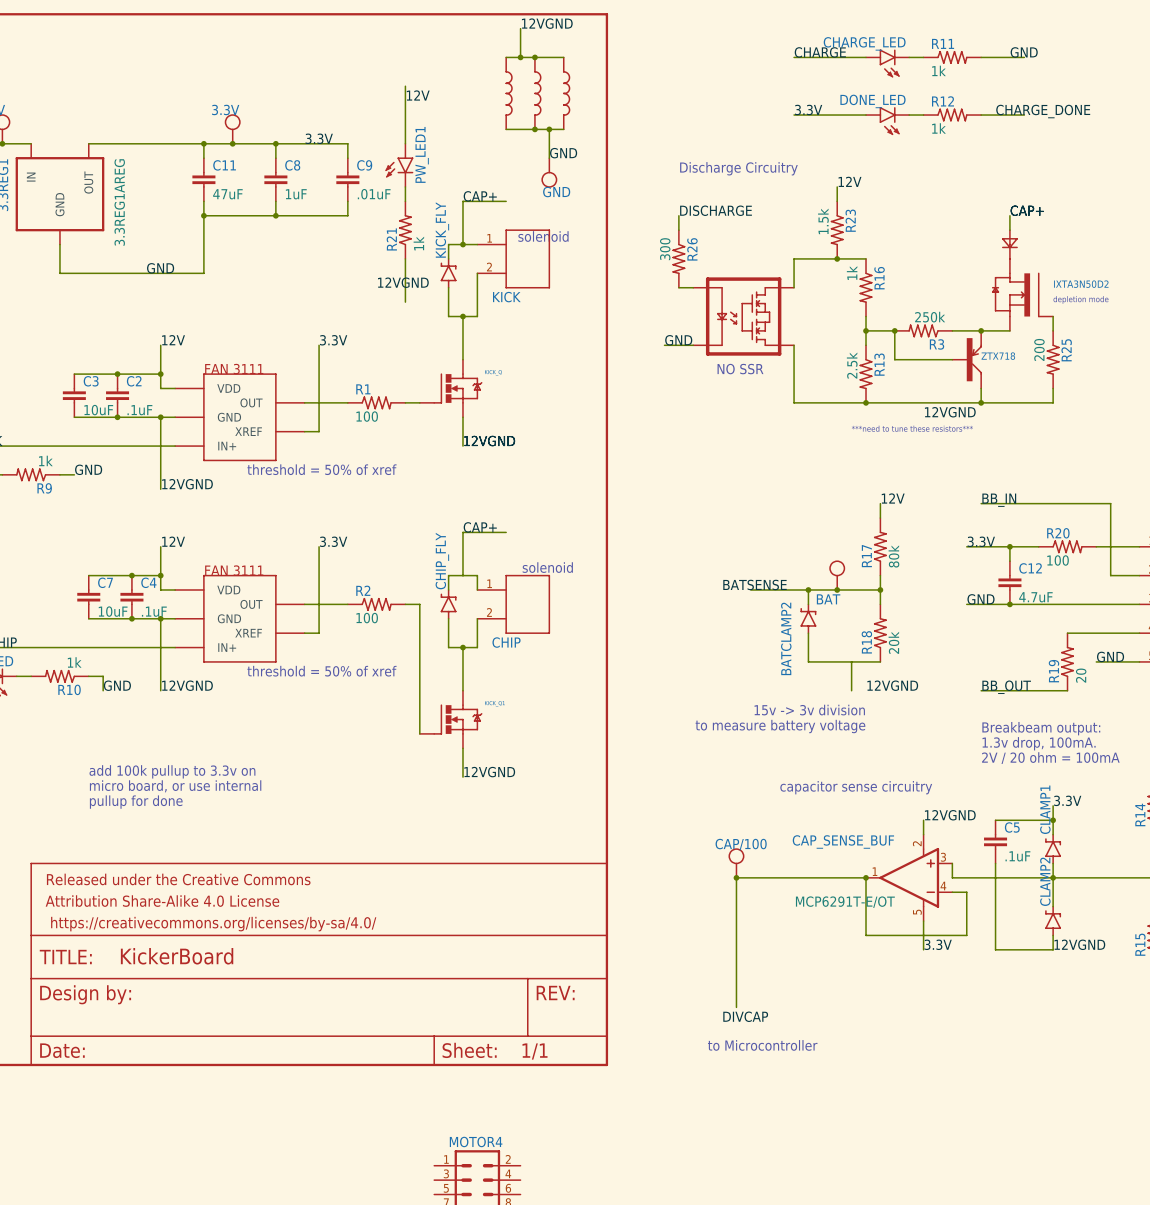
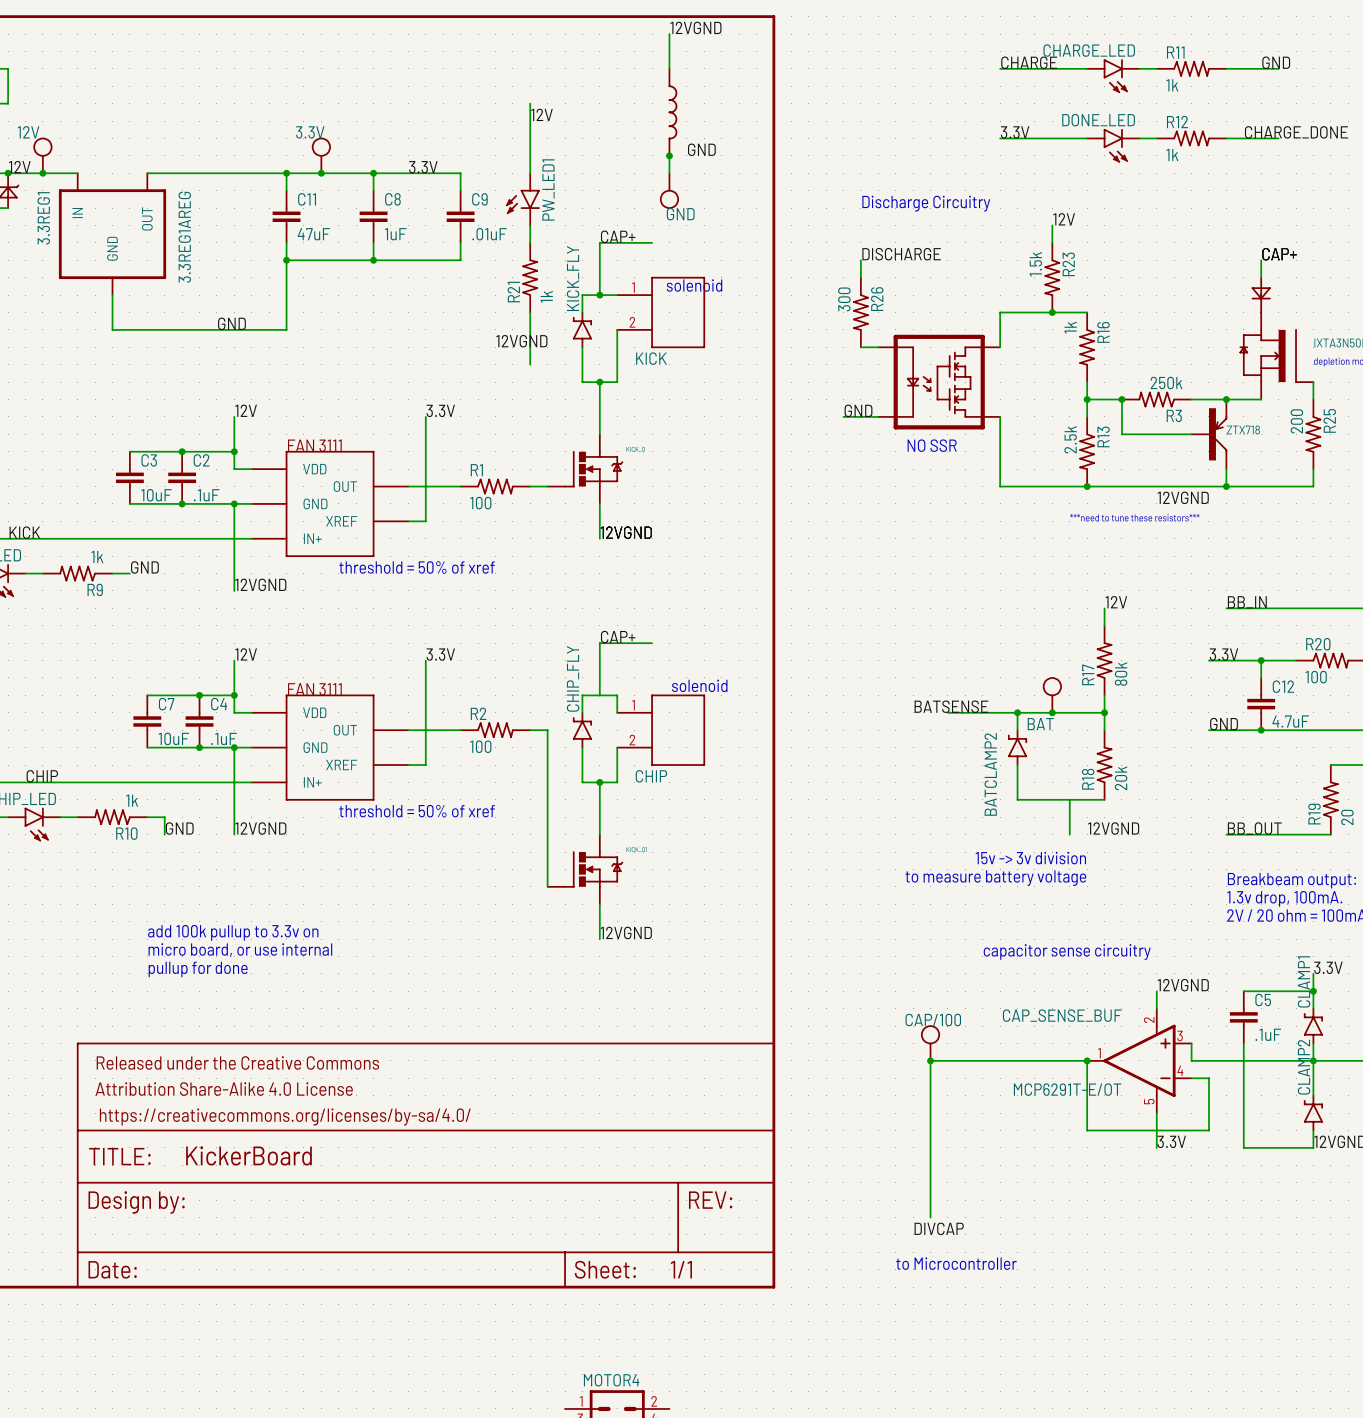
wire: (506, 57) (563, 57) -> none
junction: (520, 57) -> none
junction: (534, 57) -> none
part: (509, 93) -> none
part: none -> (672, 112)
part: (537, 93) -> none
part: (566, 93) -> none
wire: (506, 129) (563, 129) -> none
wire: none -> (669, 155) (669, 173)
junction: none -> (669, 155)
junction: (534, 129) -> none
wire: (549, 129) (549, 158) -> none
junction: (549, 129) -> none
label position: GND (563, 153) -> GND (701, 149)
GND position: (549, 172) -> (669, 191)

